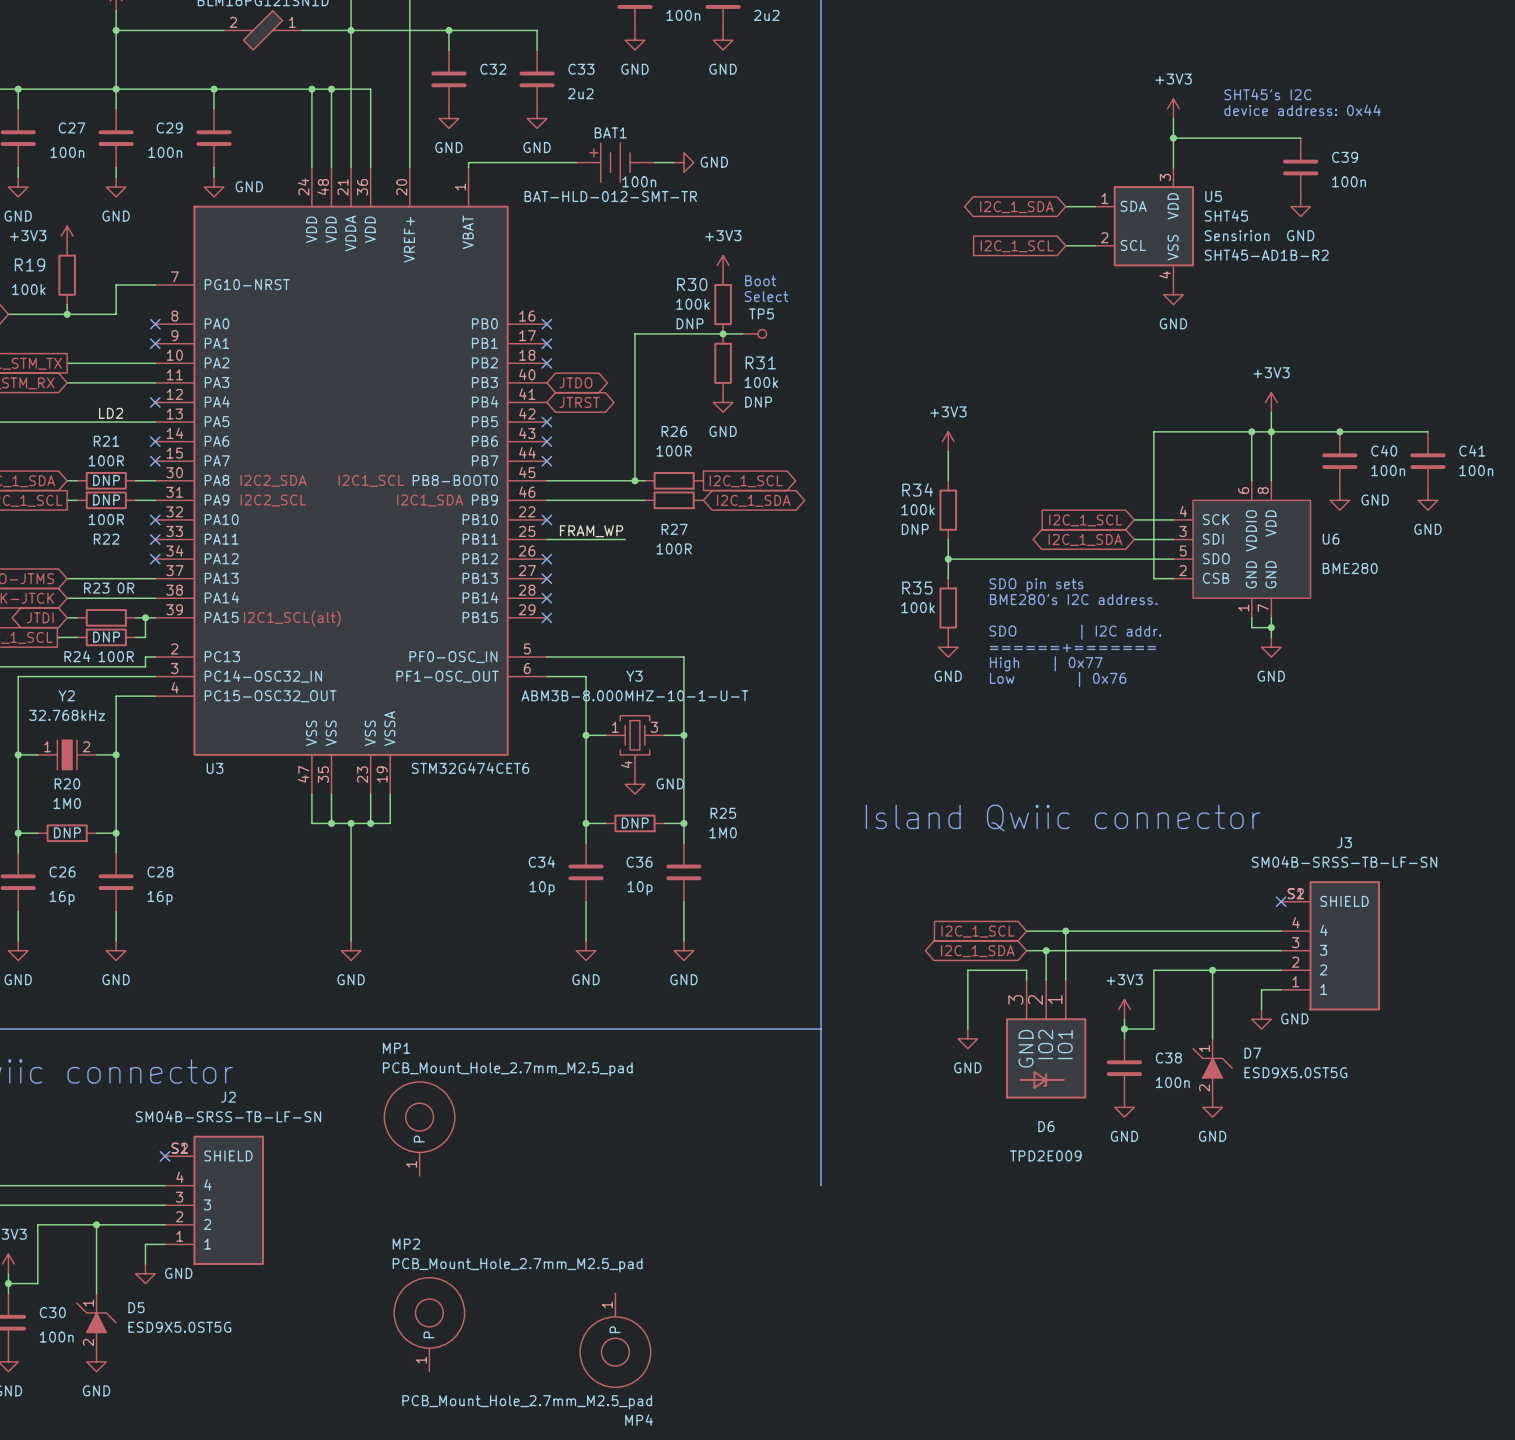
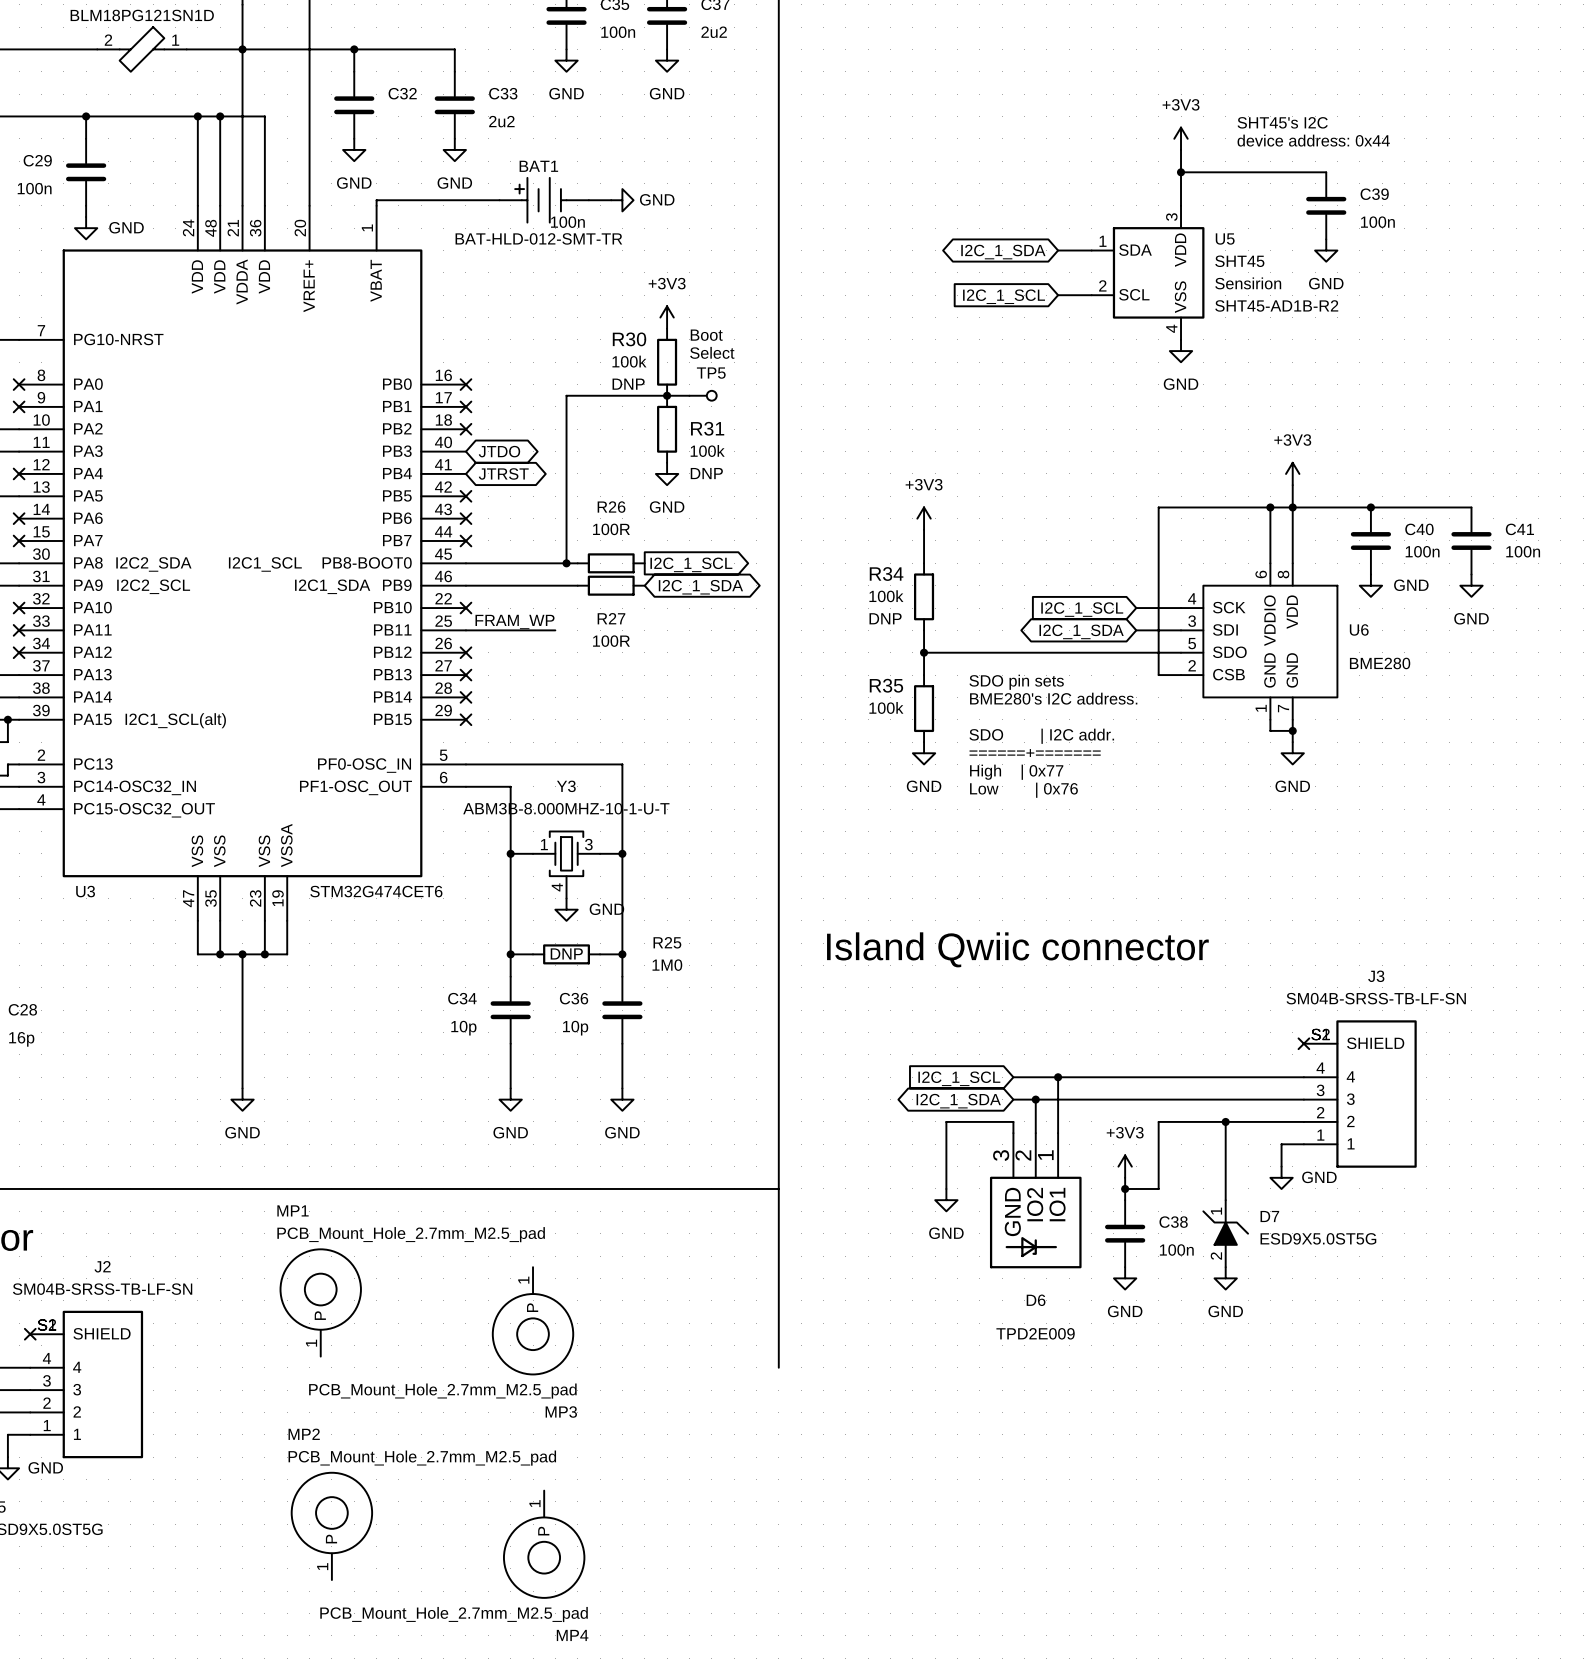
MP3: none -> PCB_Mount_Hole_2.7mm_M2.5_pad (533, 1320)

